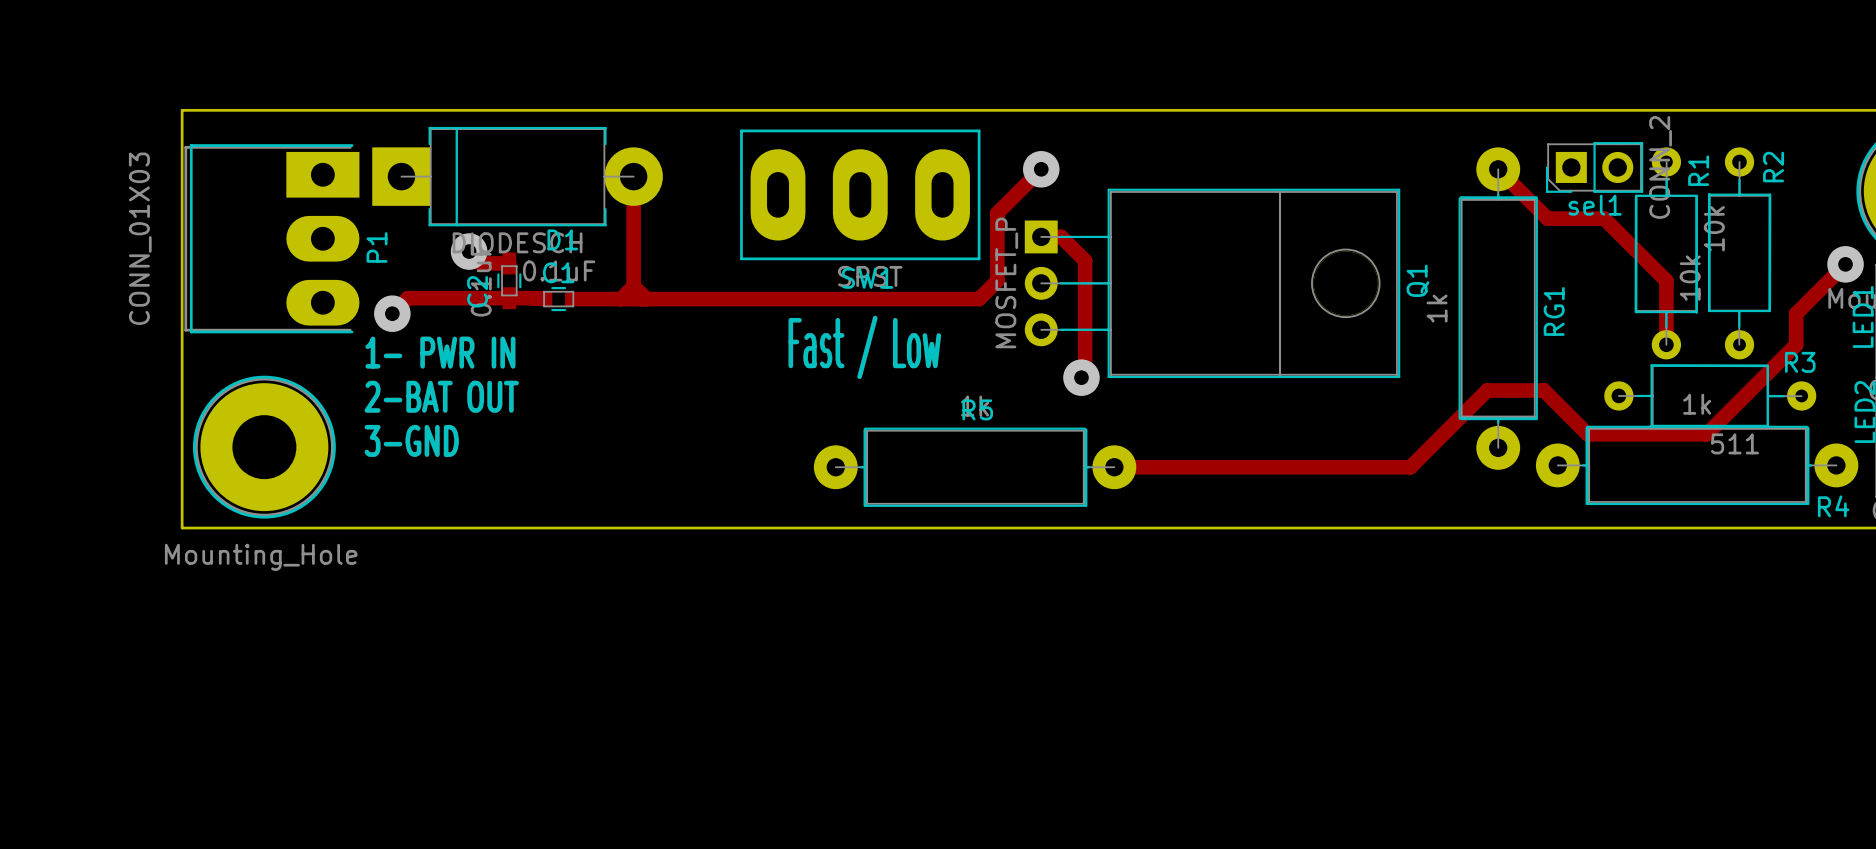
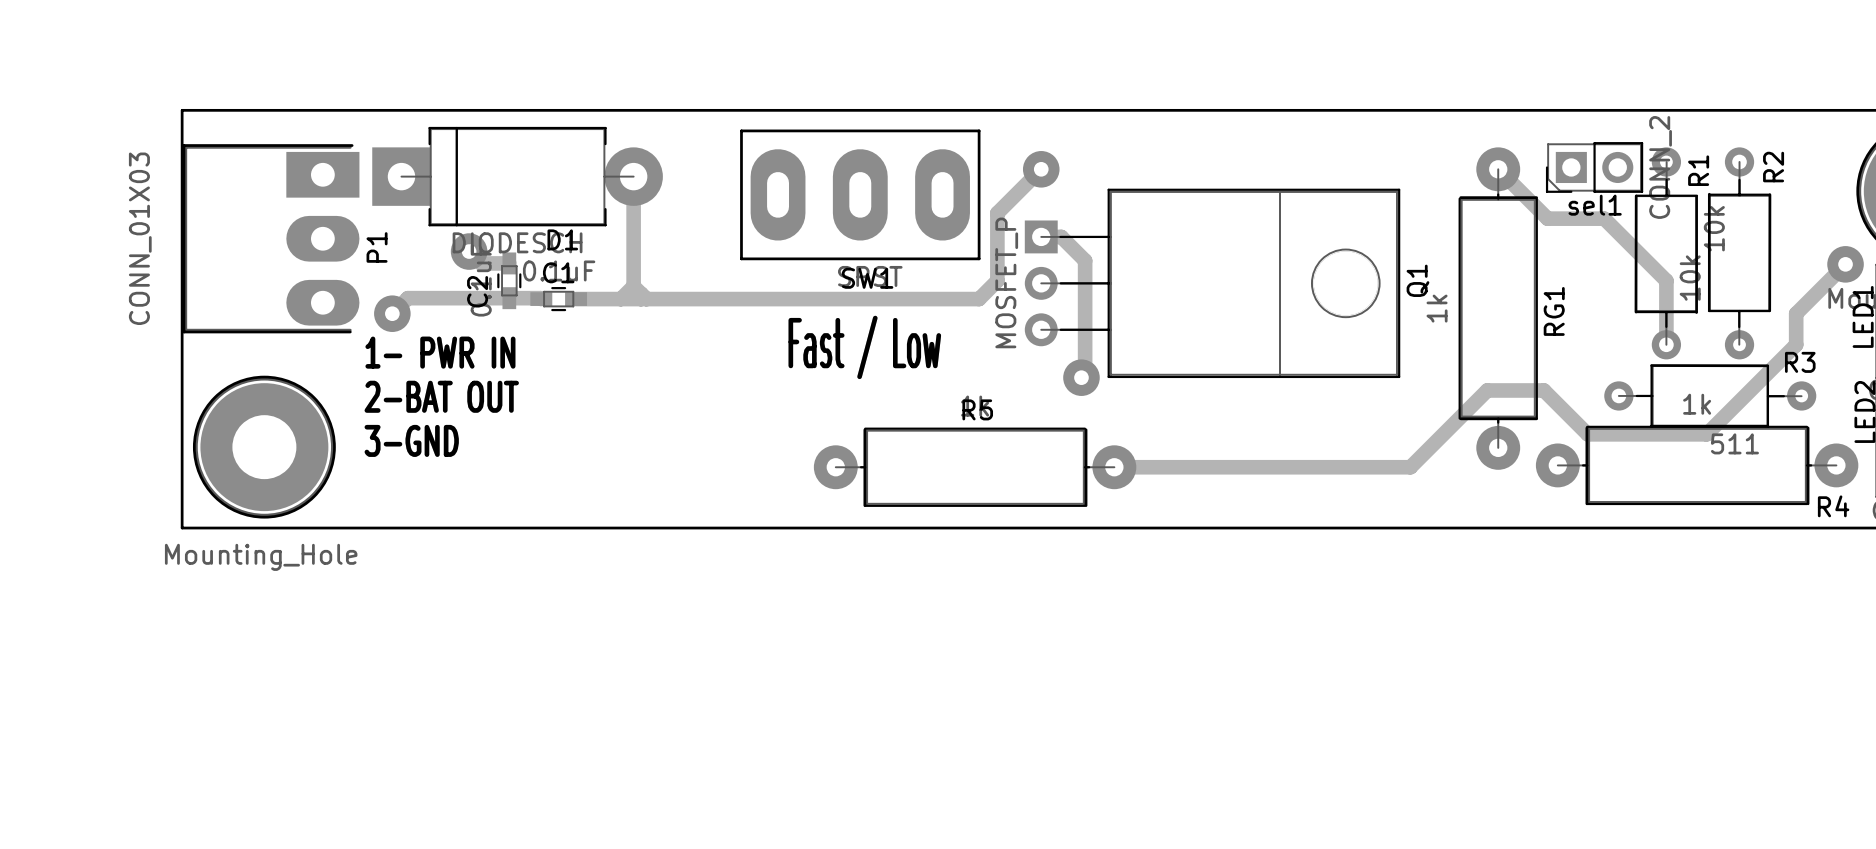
P1 footprint: [184, 144, 360, 334] -> [182, 144, 360, 334]

